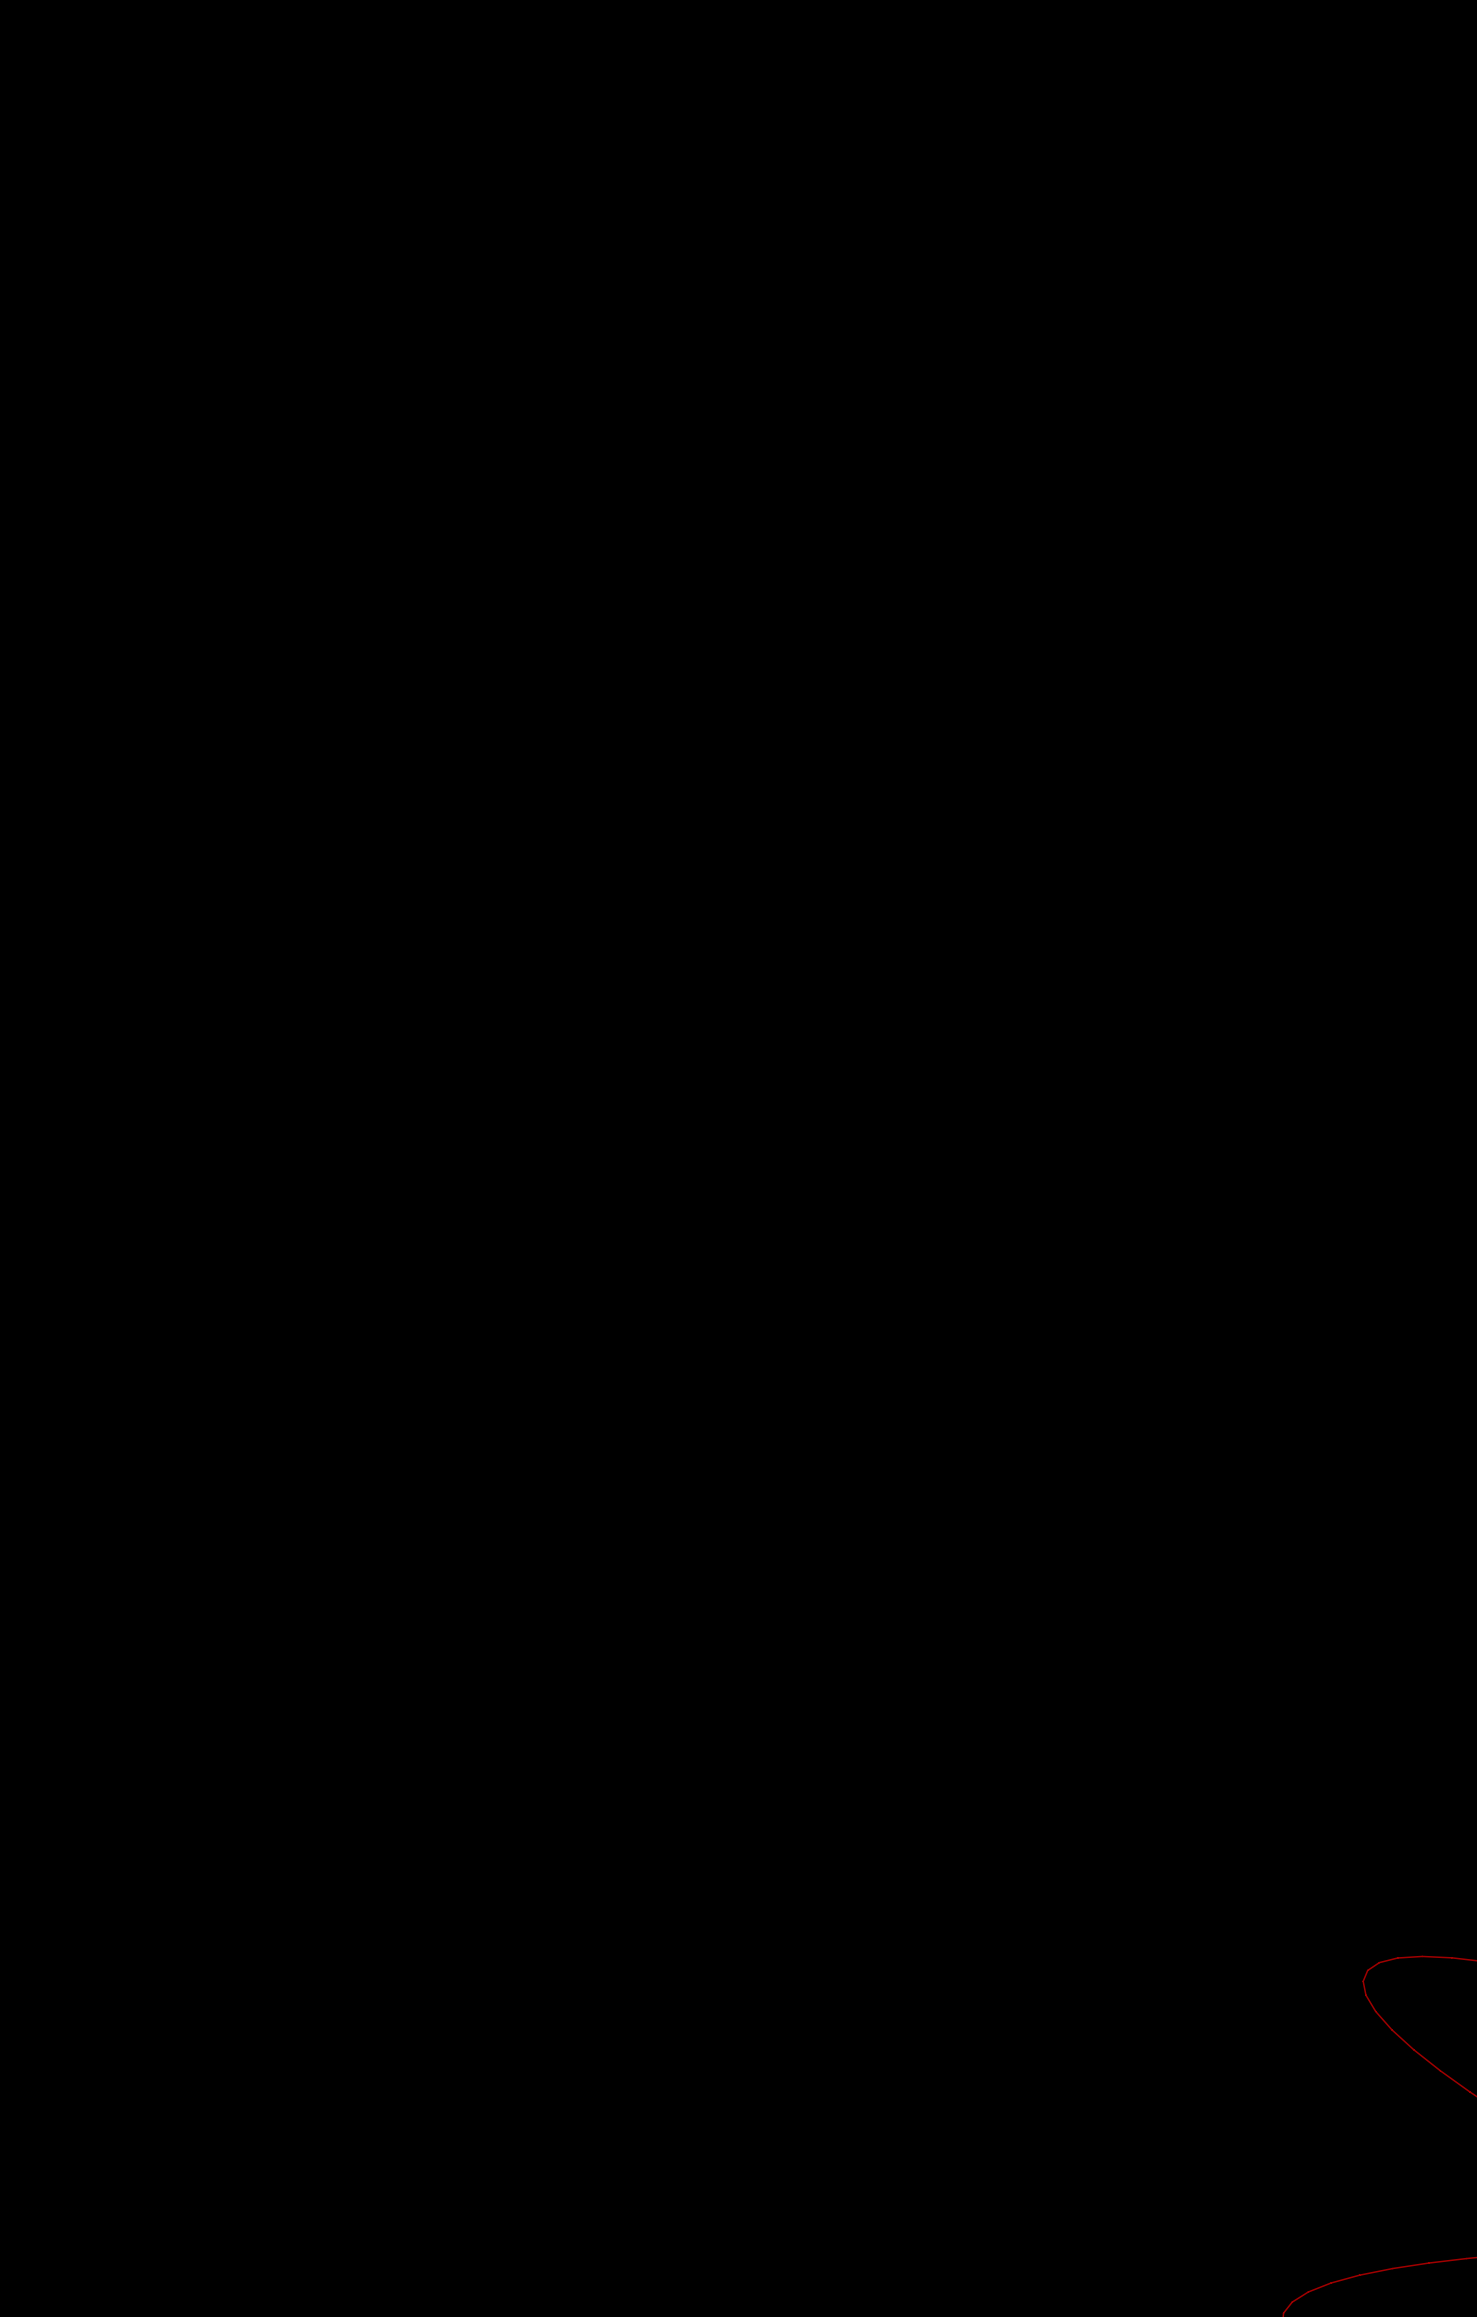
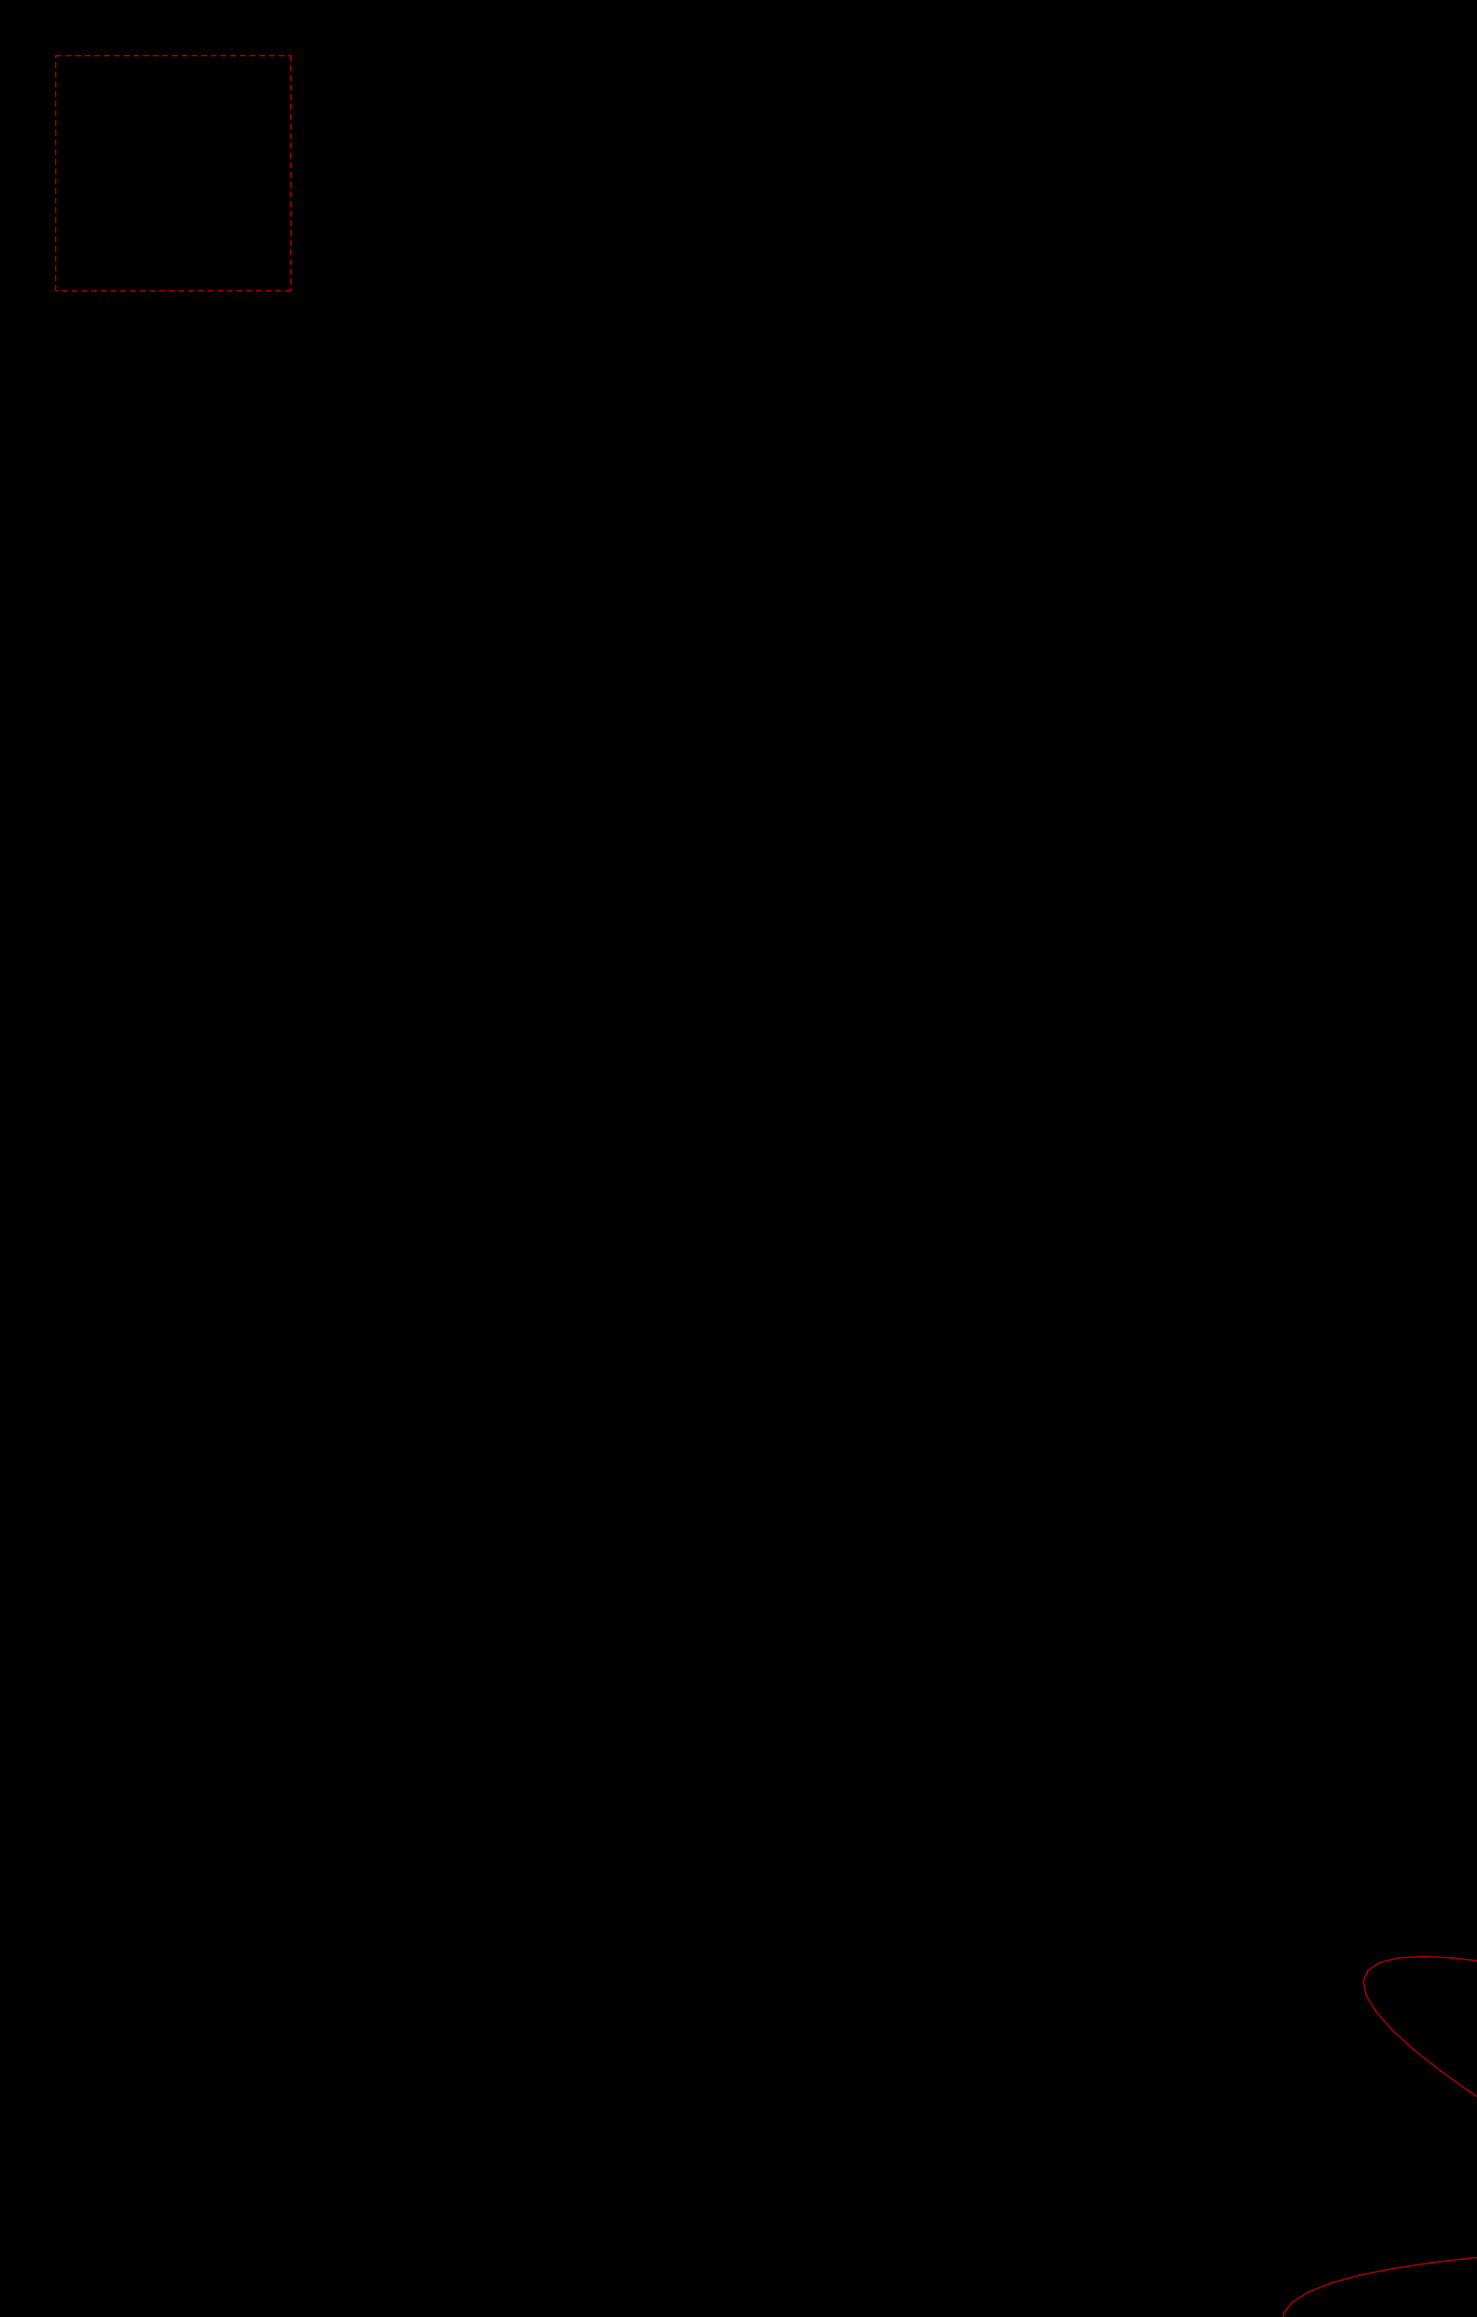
zone outline: none -> (55, 55) (290, 55) (290, 290) (55, 290) (55, 55)

